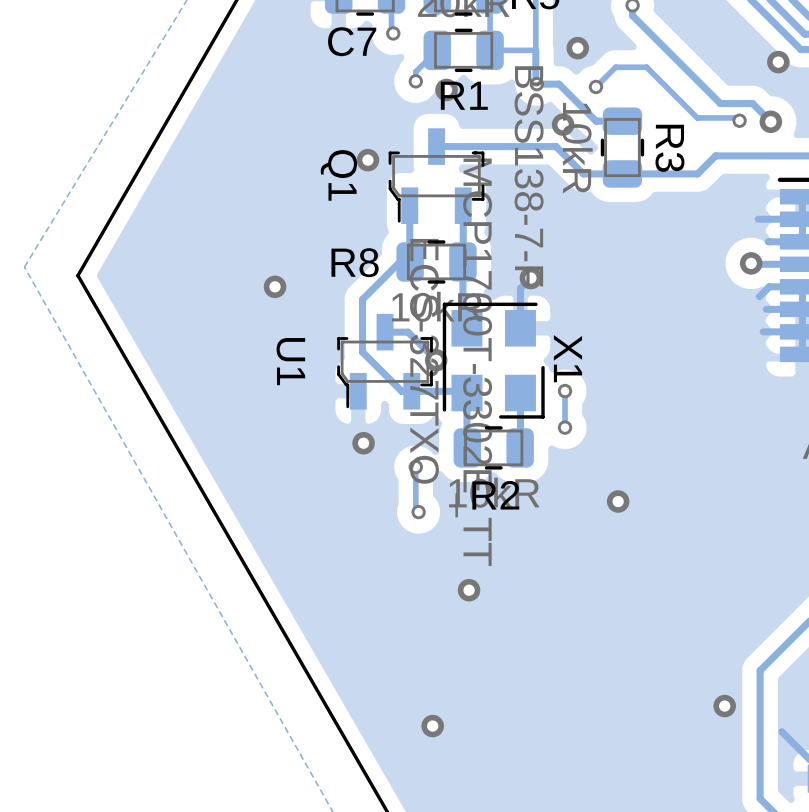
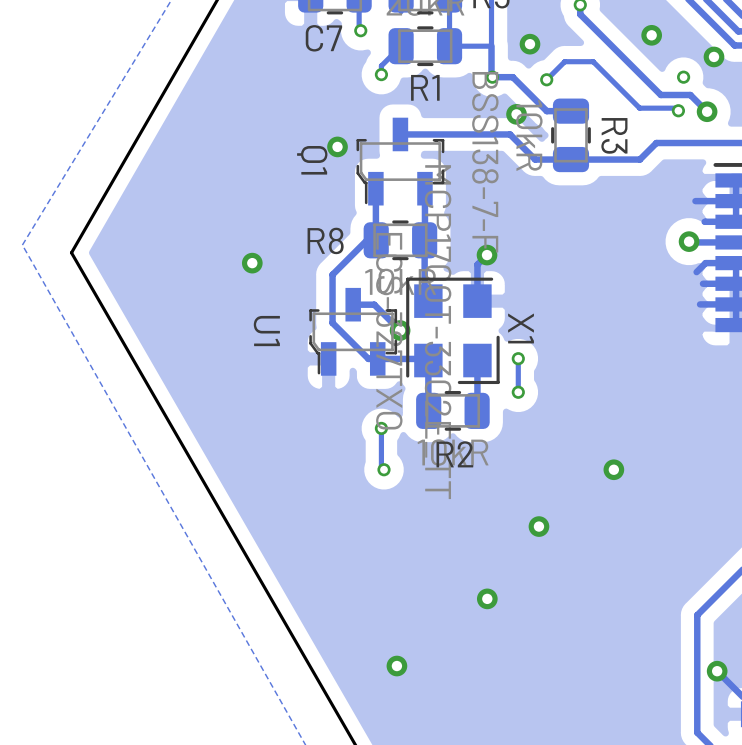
via: none -> (651, 35)
via: none -> (683, 77)
via: (446, 89) -> none
via: (363, 443) -> none
via: (618, 501) -> none
via: none -> (613, 469)
via: none -> (538, 526)
via: (469, 590) -> none
via: none -> (487, 598)
via: (724, 706) -> none
via: none -> (717, 671)

